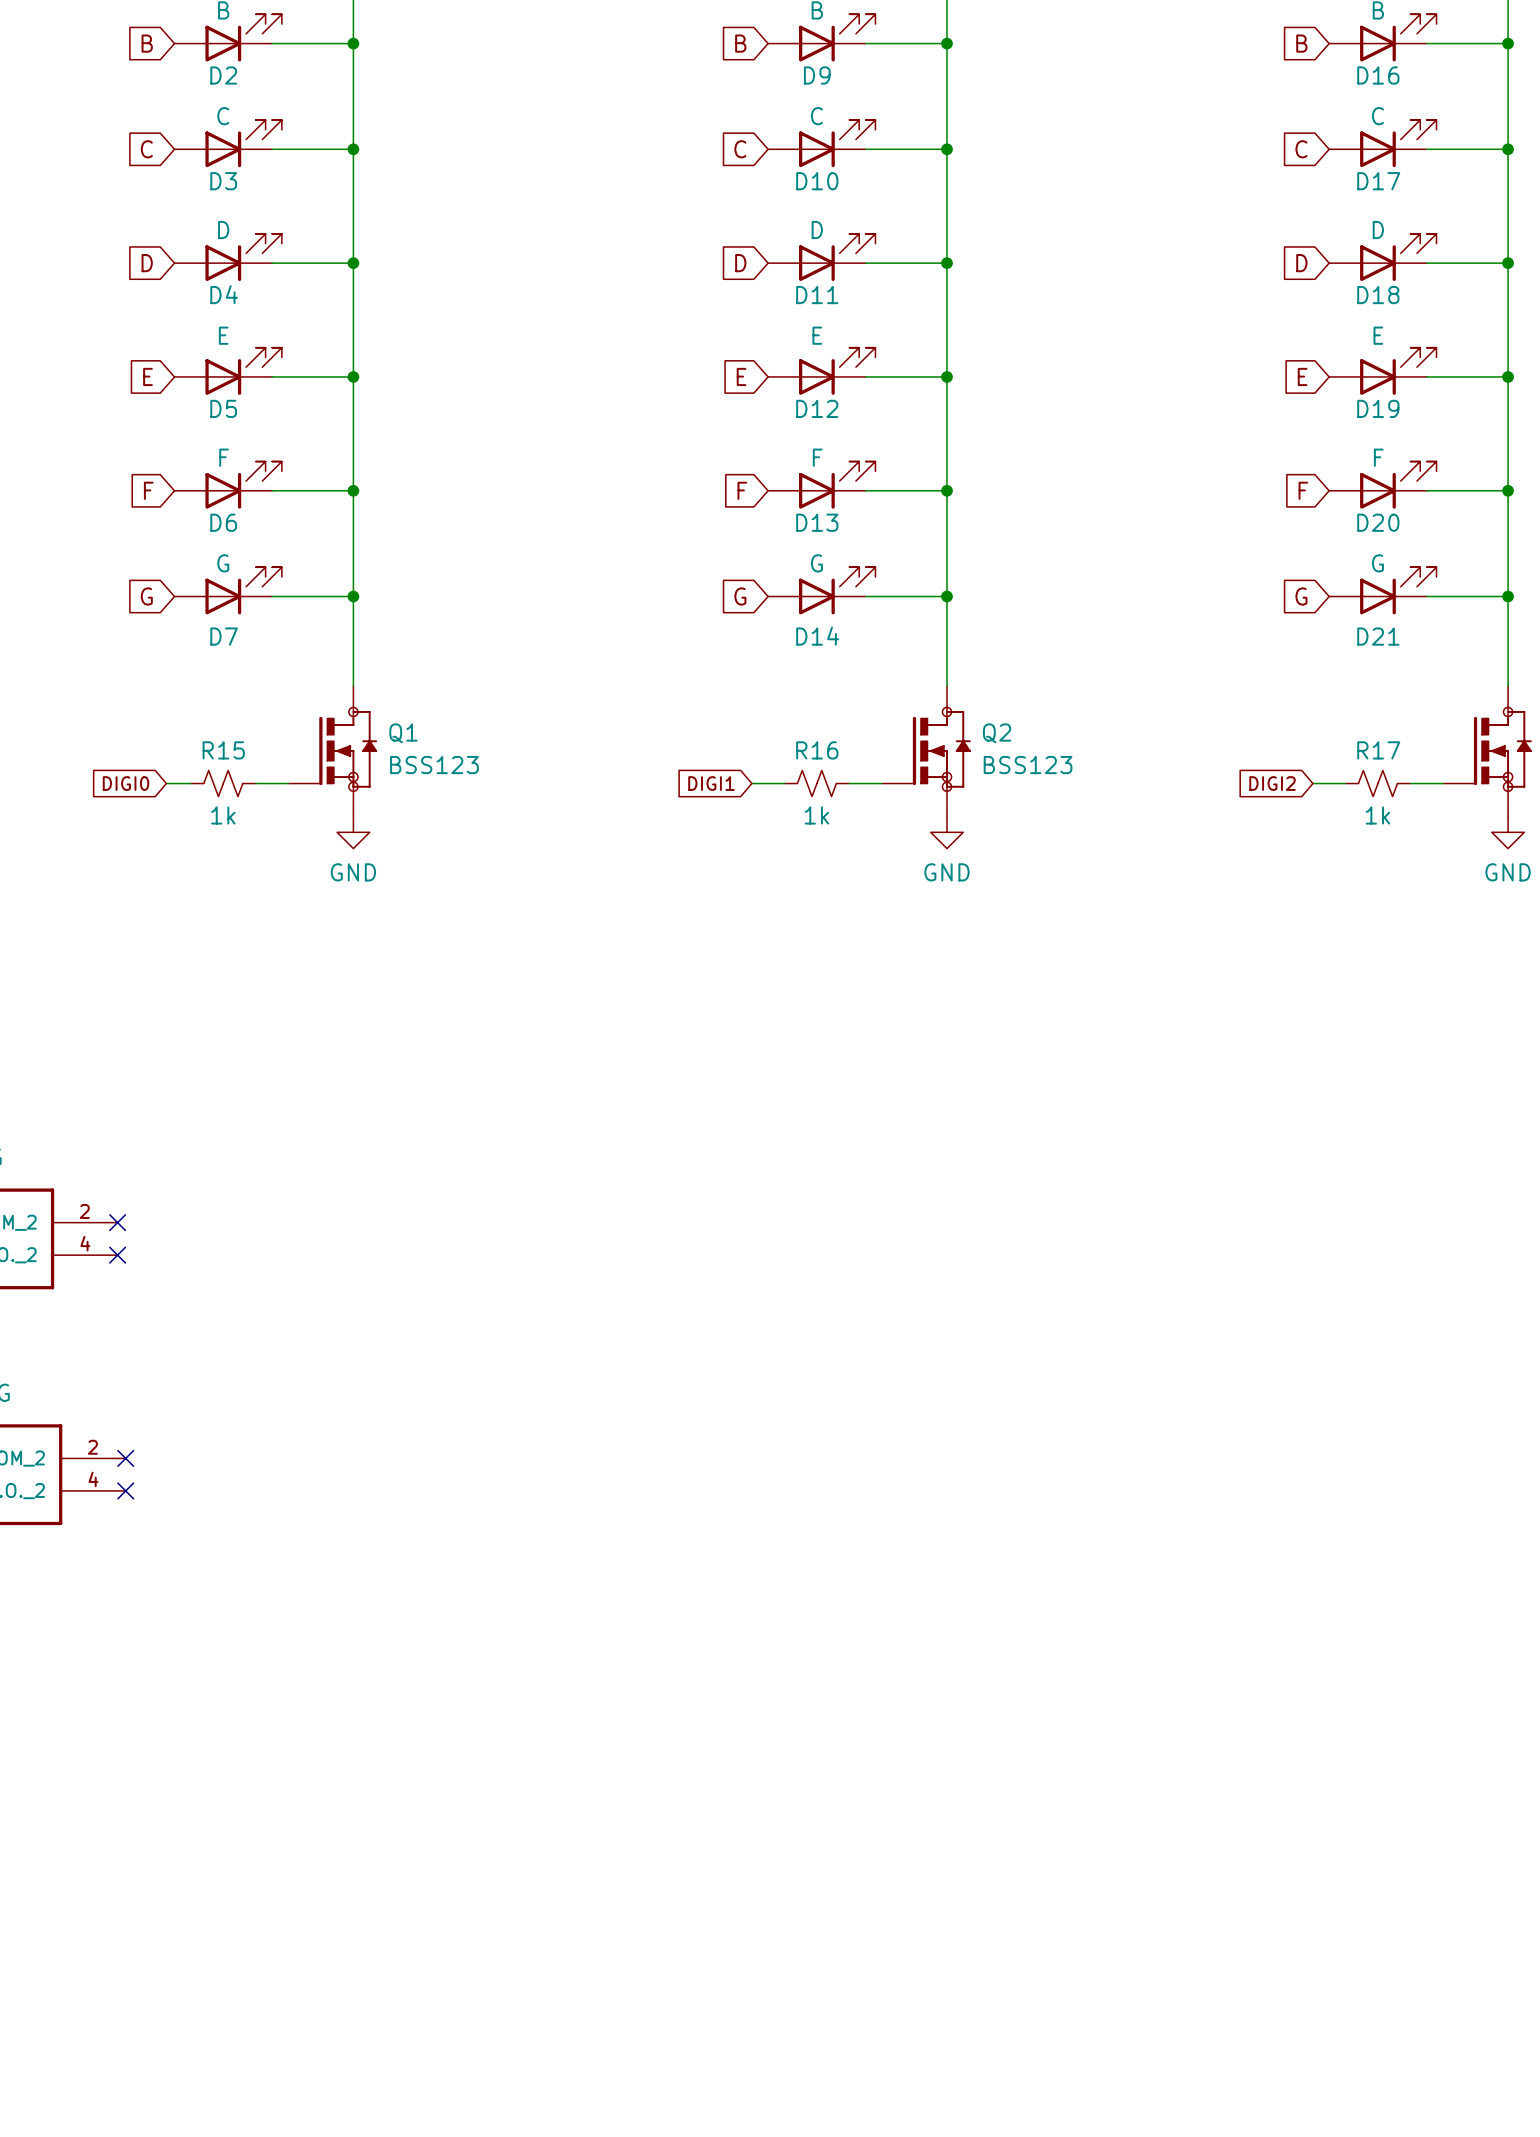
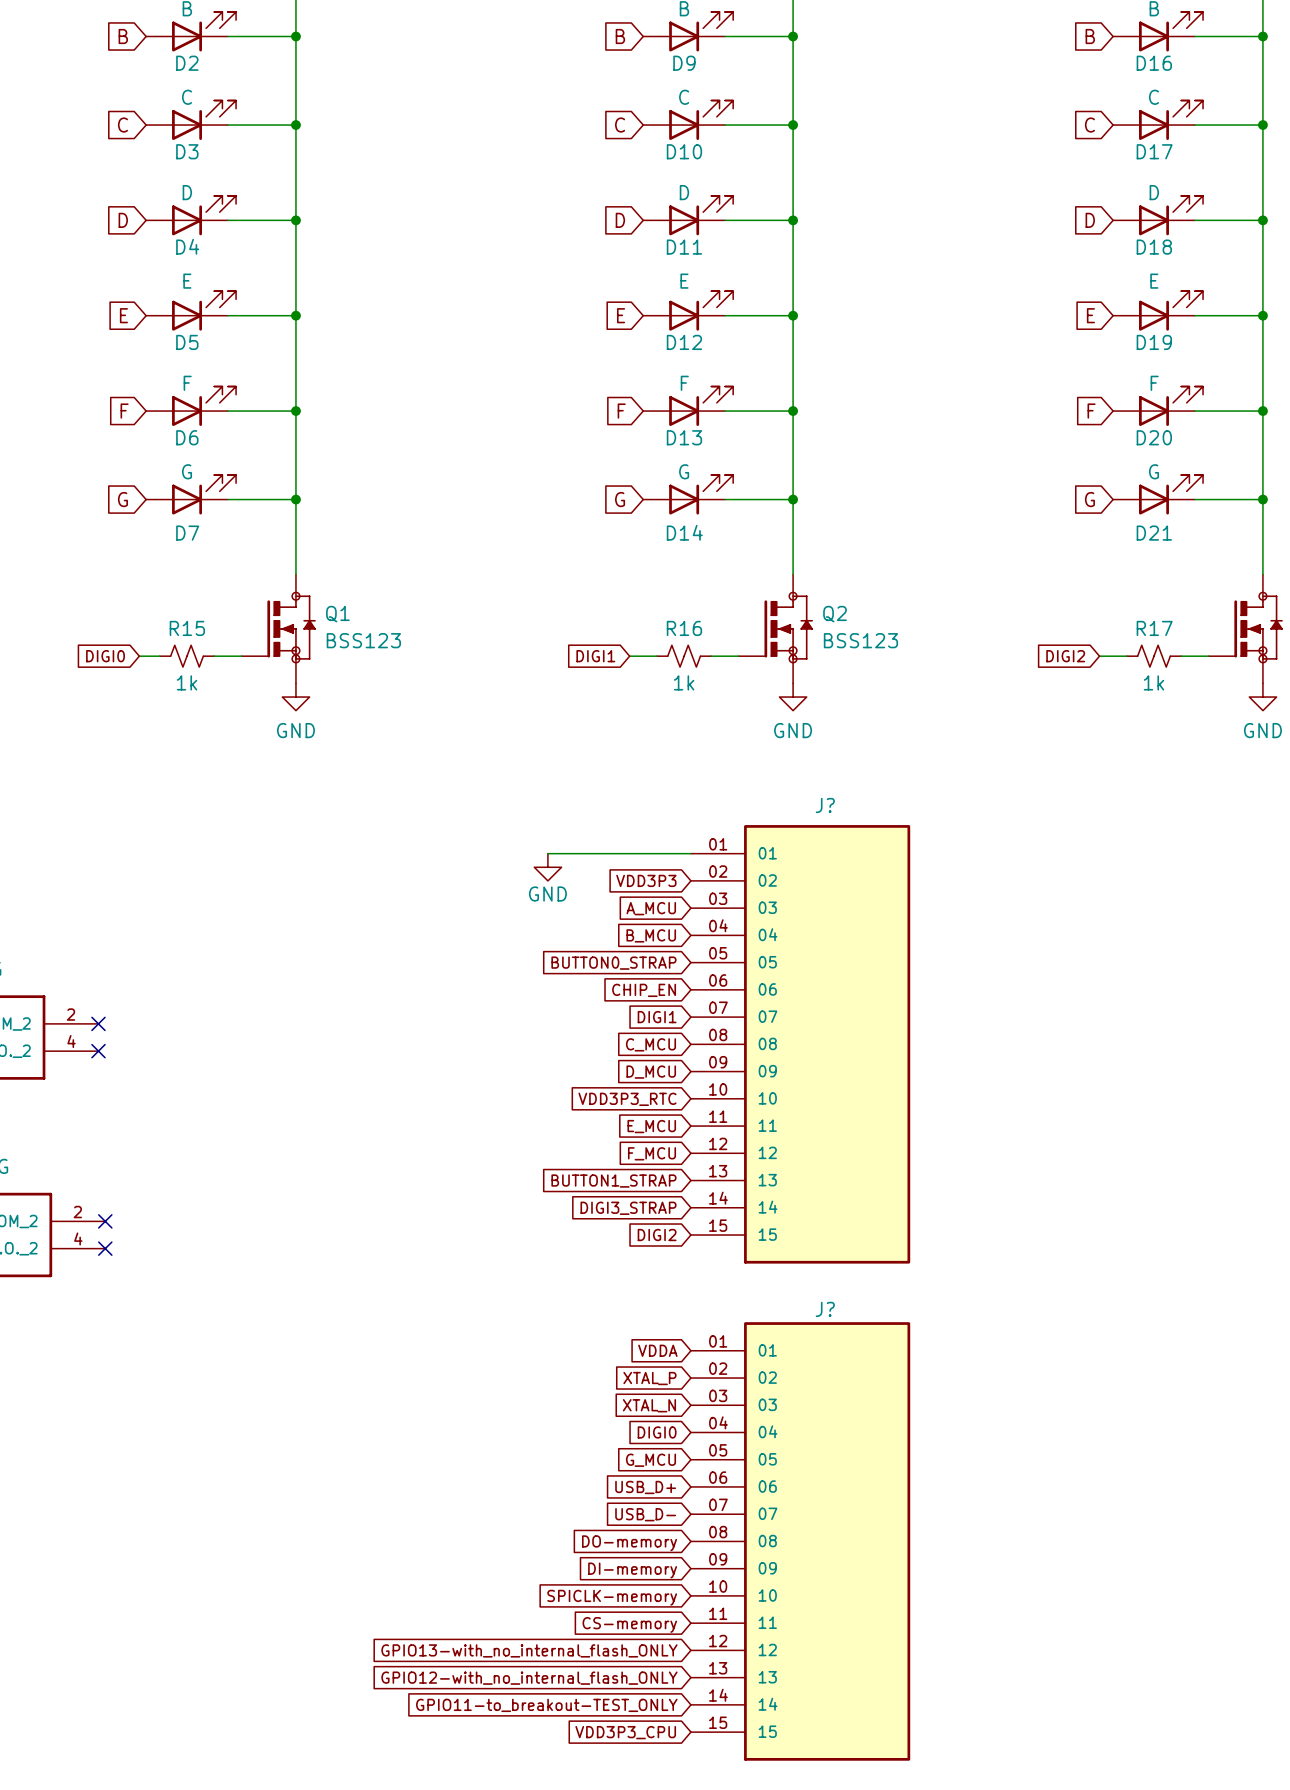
wire: none -> (547, 853) (690, 853)
power symbol: none -> GND (547, 867)
global label: none -> VDD3P3 (646, 880)
global label: none -> A_MCU (651, 908)
global label: none -> B_MCU (651, 935)
global label: none -> BUTTON0_STRAP (613, 963)
global label: none -> CHIP_EN (644, 990)
global label: none -> DIGI1 (657, 1017)
global label: none -> C_MCU (650, 1044)
J?: none -> (800, 1044)
global label: none -> D_MCU (651, 1072)
global label: none -> VDD3P3_RTC (627, 1099)
global label: none -> E_MCU (651, 1126)
global label: none -> F_MCU (652, 1153)
global label: none -> BUTTON1_STRAP (613, 1181)
global label: none -> DIGI3_STRAP (628, 1208)
global label: none -> DIGI2 (657, 1235)
global label: none -> VDDA (657, 1350)
global label: none -> XTAL_P (649, 1378)
global label: none -> XTAL_N (649, 1405)
global label: none -> DIGI0 (657, 1432)
global label: none -> G_MCU (650, 1460)
global label: none -> USB_D+ (645, 1487)
global label: none -> USB_D- (645, 1514)
J?: none -> (800, 1541)
global label: none -> DO-memory (629, 1543)
global label: none -> DI-memory (632, 1570)
global label: none -> SPICLK-memory (612, 1597)
global label: none -> CS-memory (629, 1624)
global label: none -> GPIO13-with_no_internal_flash_ONLY (529, 1650)
global label: none -> GPIO12-with_no_internal_flash_ONLY (529, 1678)
global label: none -> GPIO11-to_breakout-TEST_ONLY (546, 1705)
global label: none -> VDD3P3_CPU (625, 1732)

